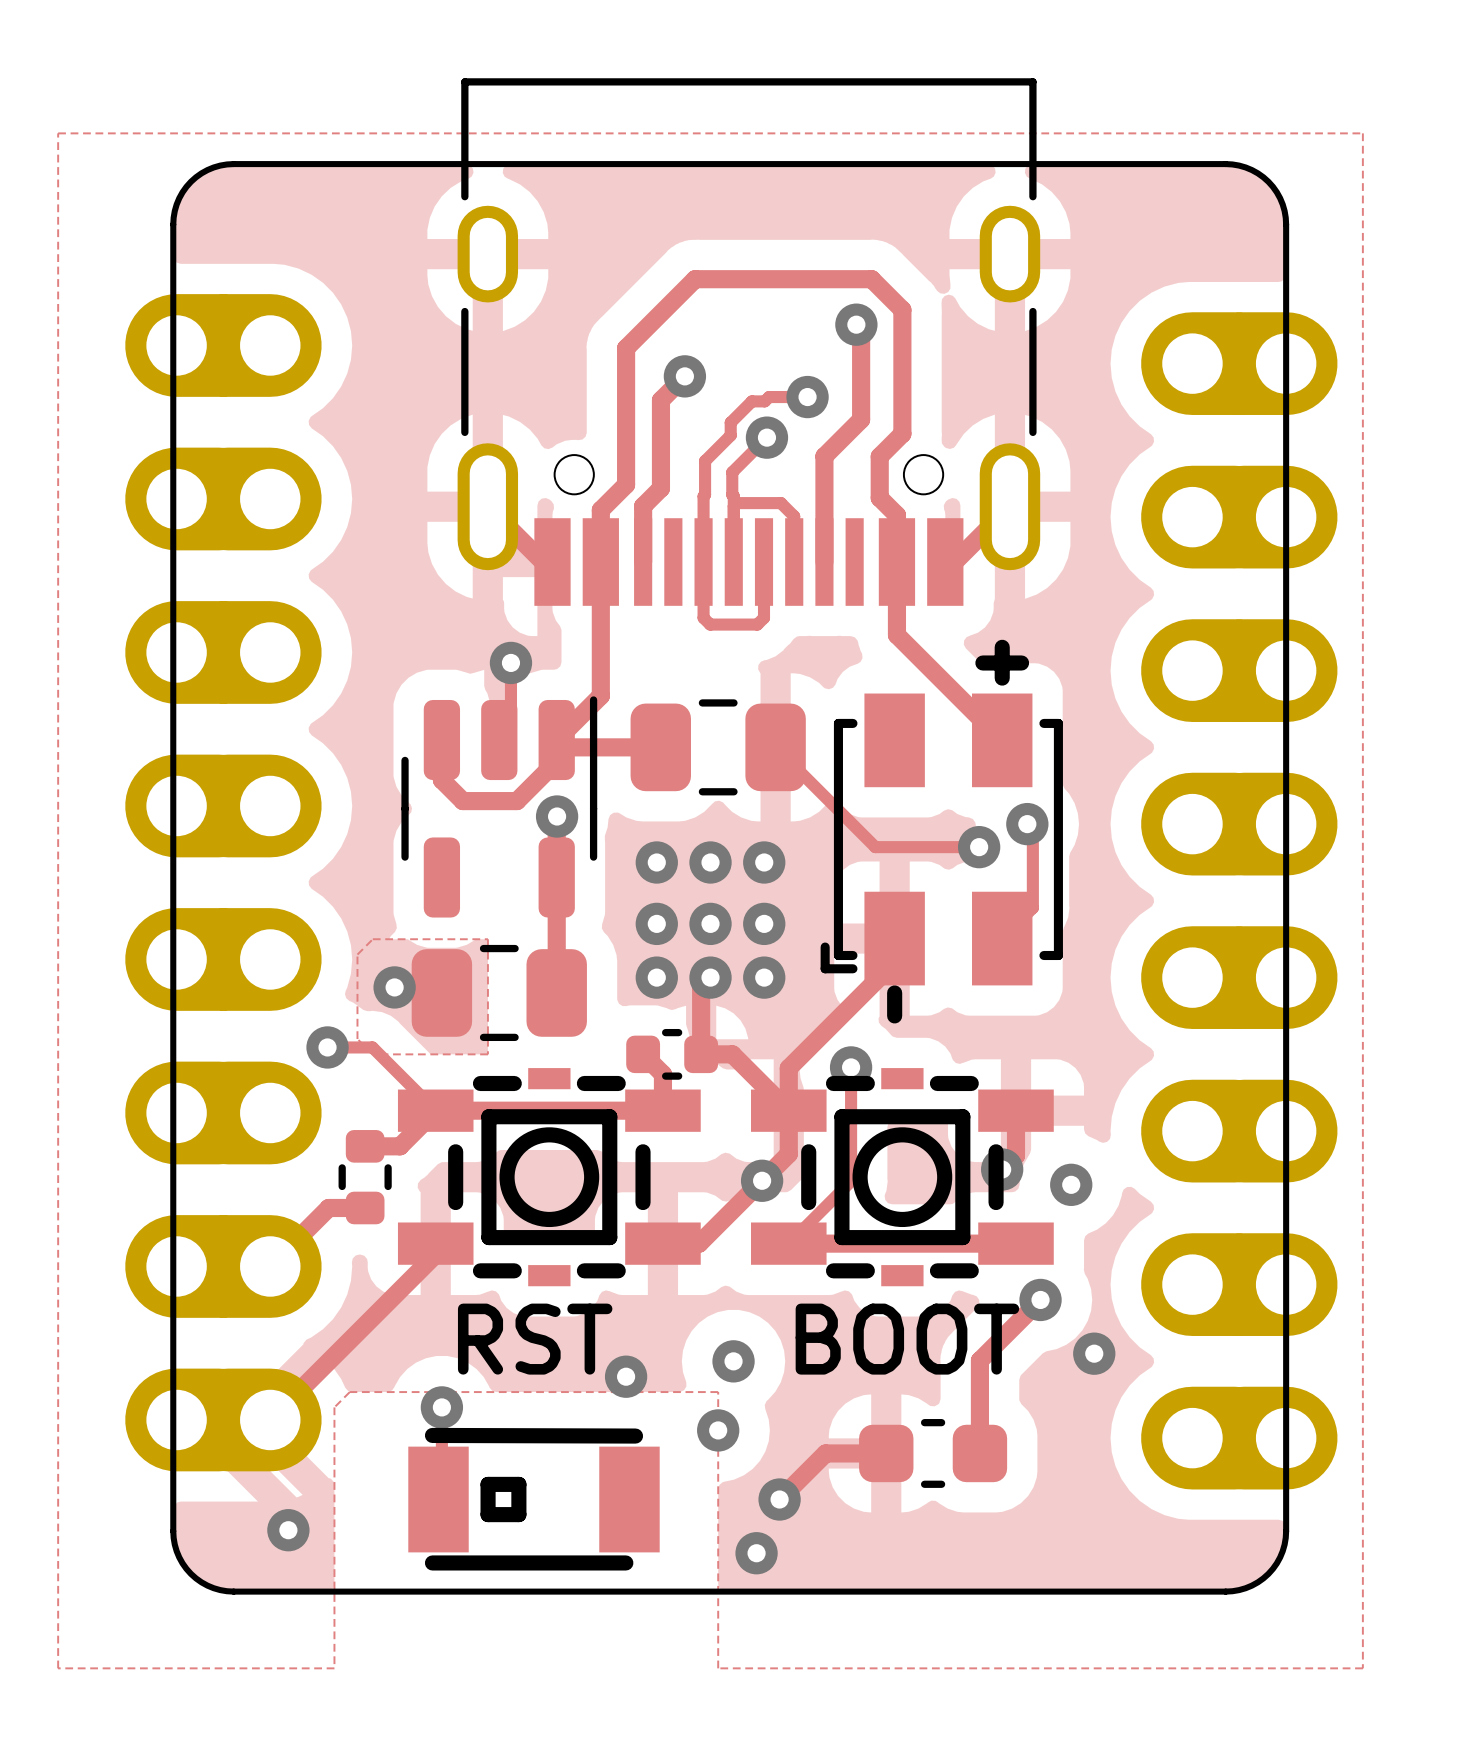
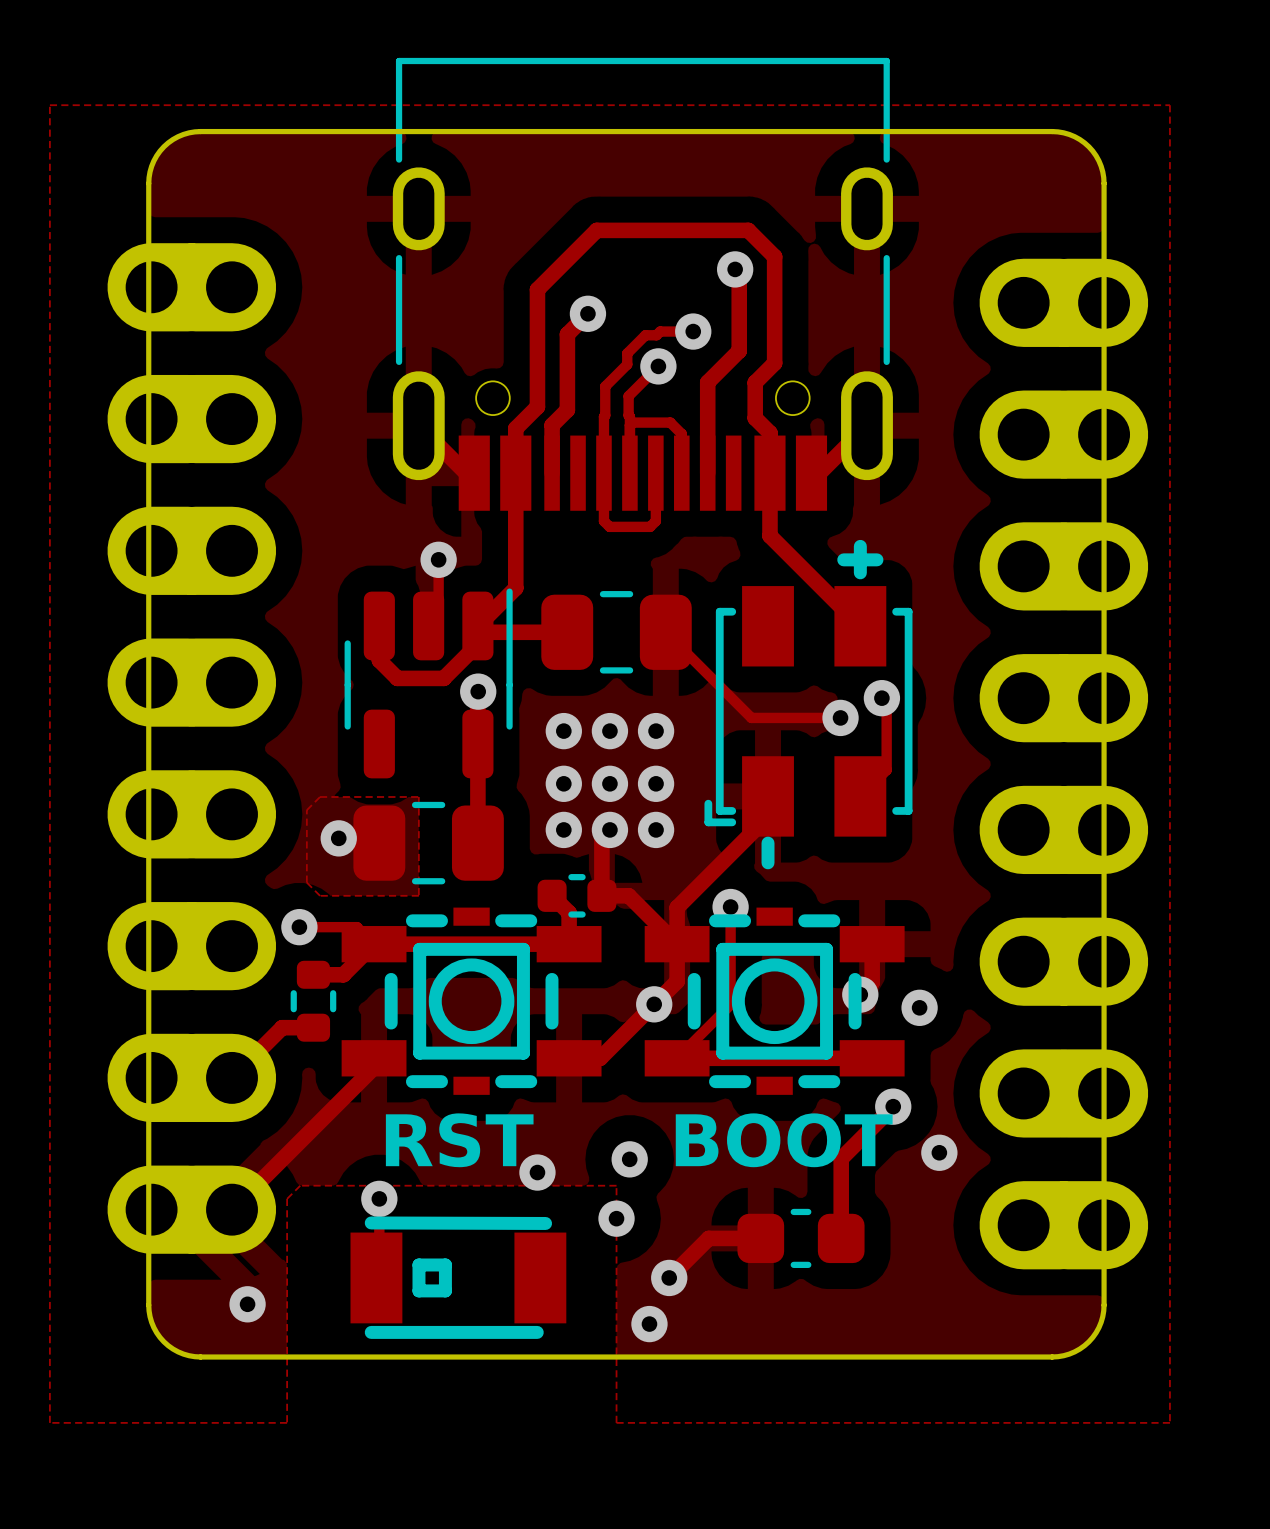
track: (327, 1047) (372, 1047) (415, 1090) -> (299, 927) (357, 927)
via position: (327, 1047) -> (299, 927)

